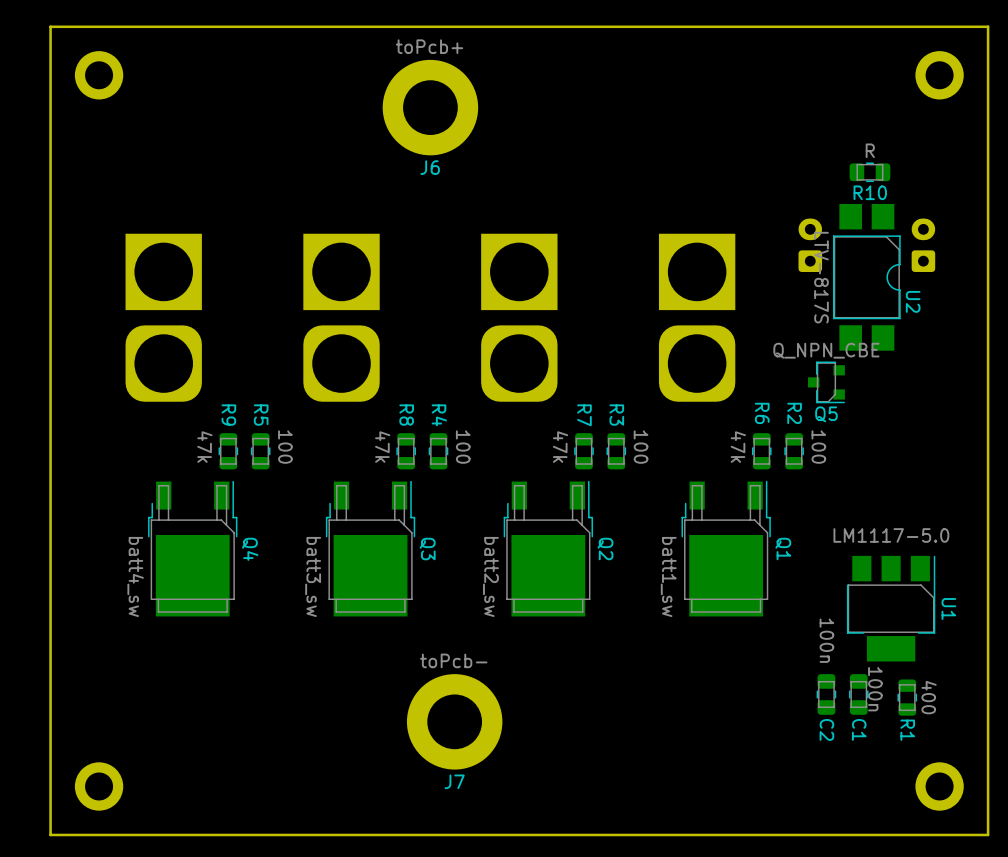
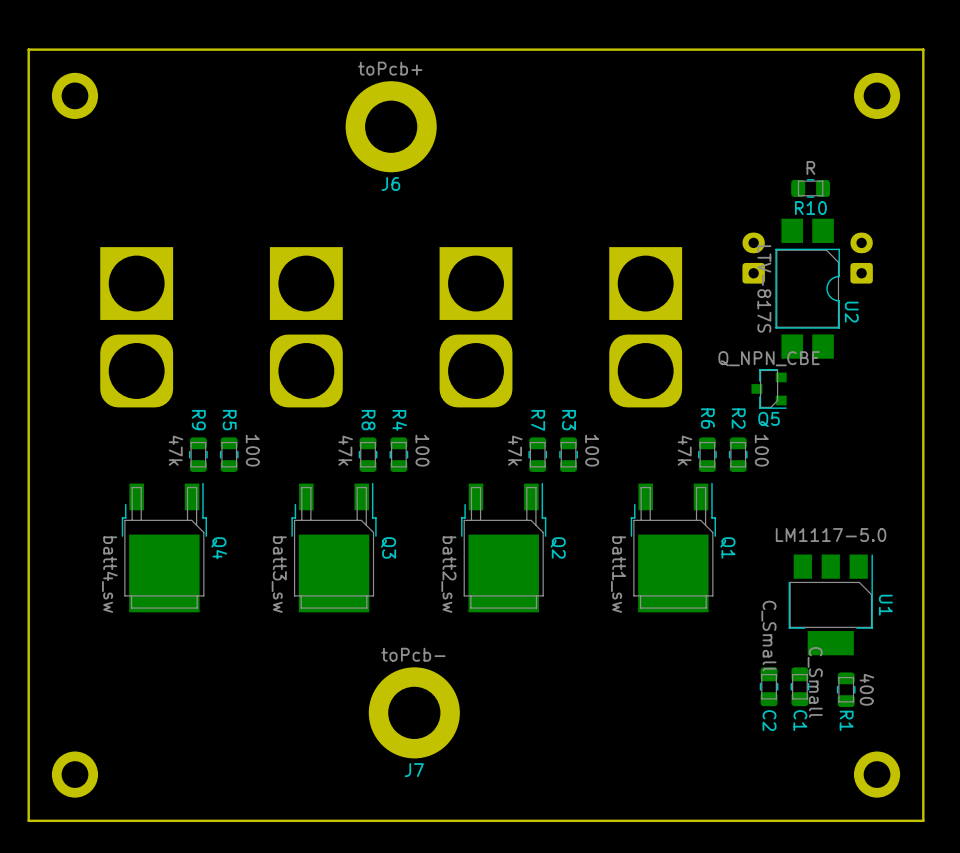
C2 value: 100n (826, 640) -> C_Small (768, 636)
C1 value: 100n (875, 689) -> C_Small (815, 682)

